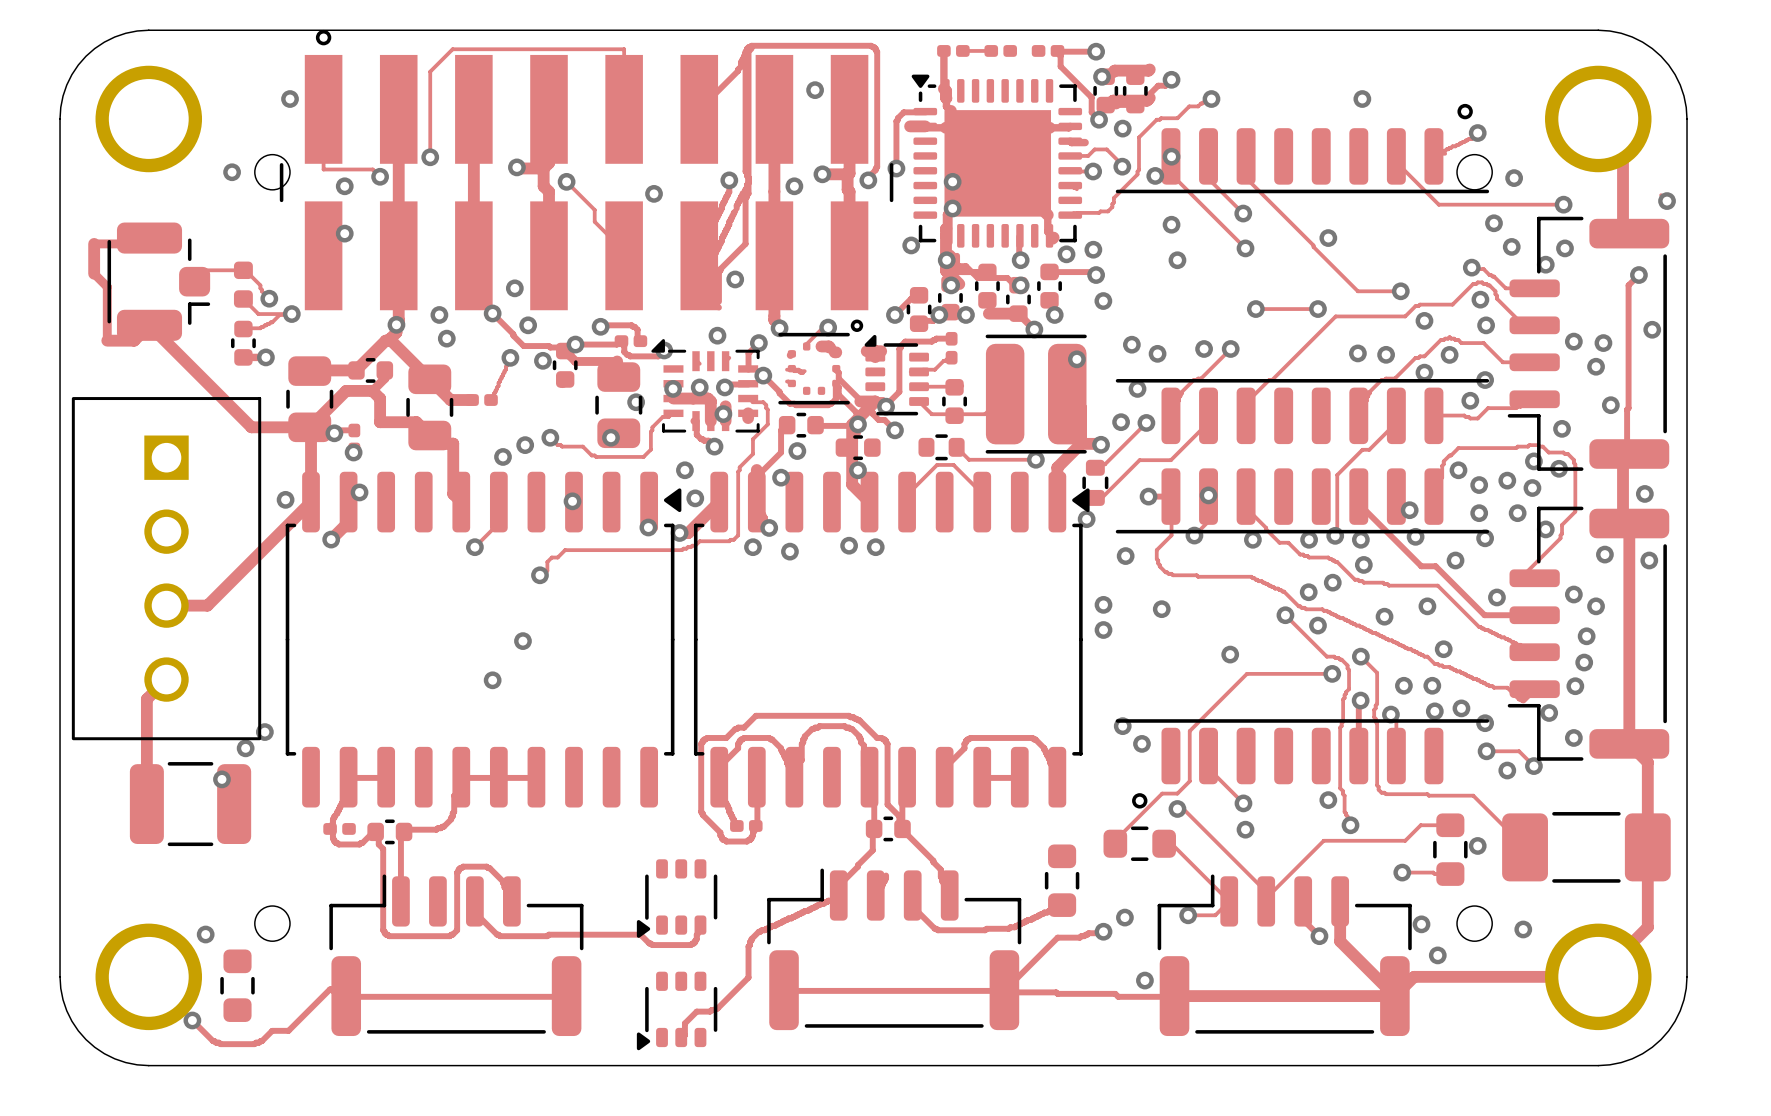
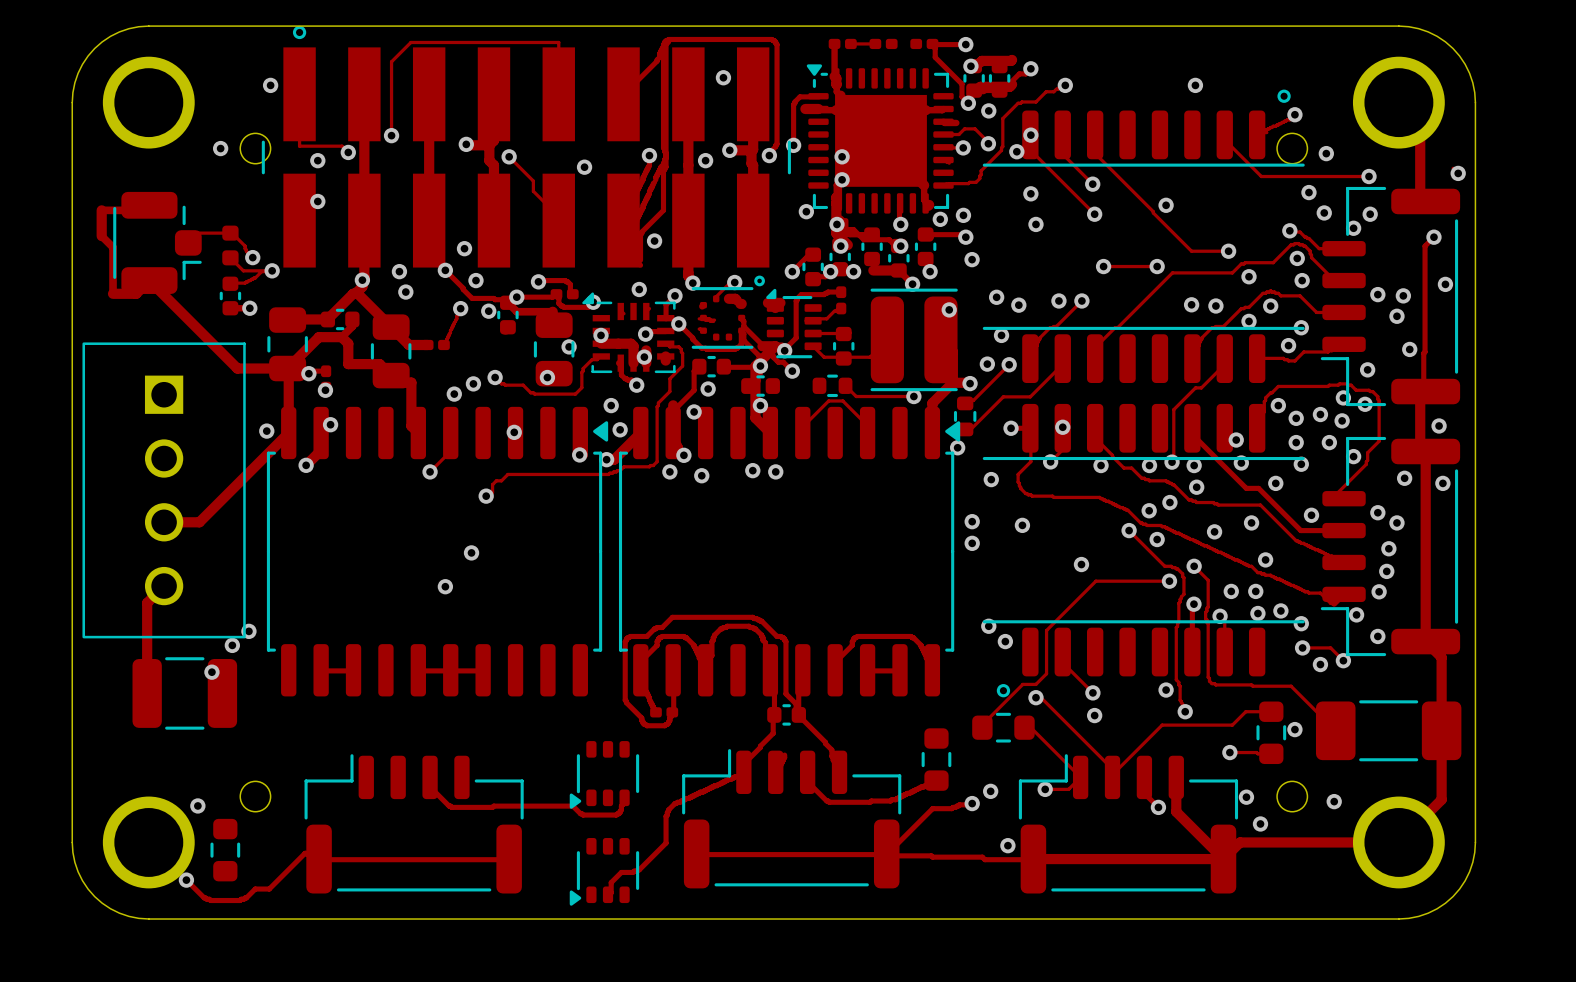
via: (699, 387) -> none
track: (349, 777) (346, 782) (344, 798) (332, 819) (329, 829) (332, 832) (334, 841) (338, 844) (359, 844) (374, 831) (378, 834) (378, 844) (383, 848) (383, 930) (386, 934) (452, 934) (457, 930) (457, 872) (463, 866) (489, 868) (503, 881) (511, 902) -> none
track: (461, 777) (458, 780) (458, 791) (454, 795) (452, 816) (443, 826) (436, 829) (406, 829) (400, 837) (400, 902) -> none
part: (339, 828) -> none
part: (389, 831) -> none

